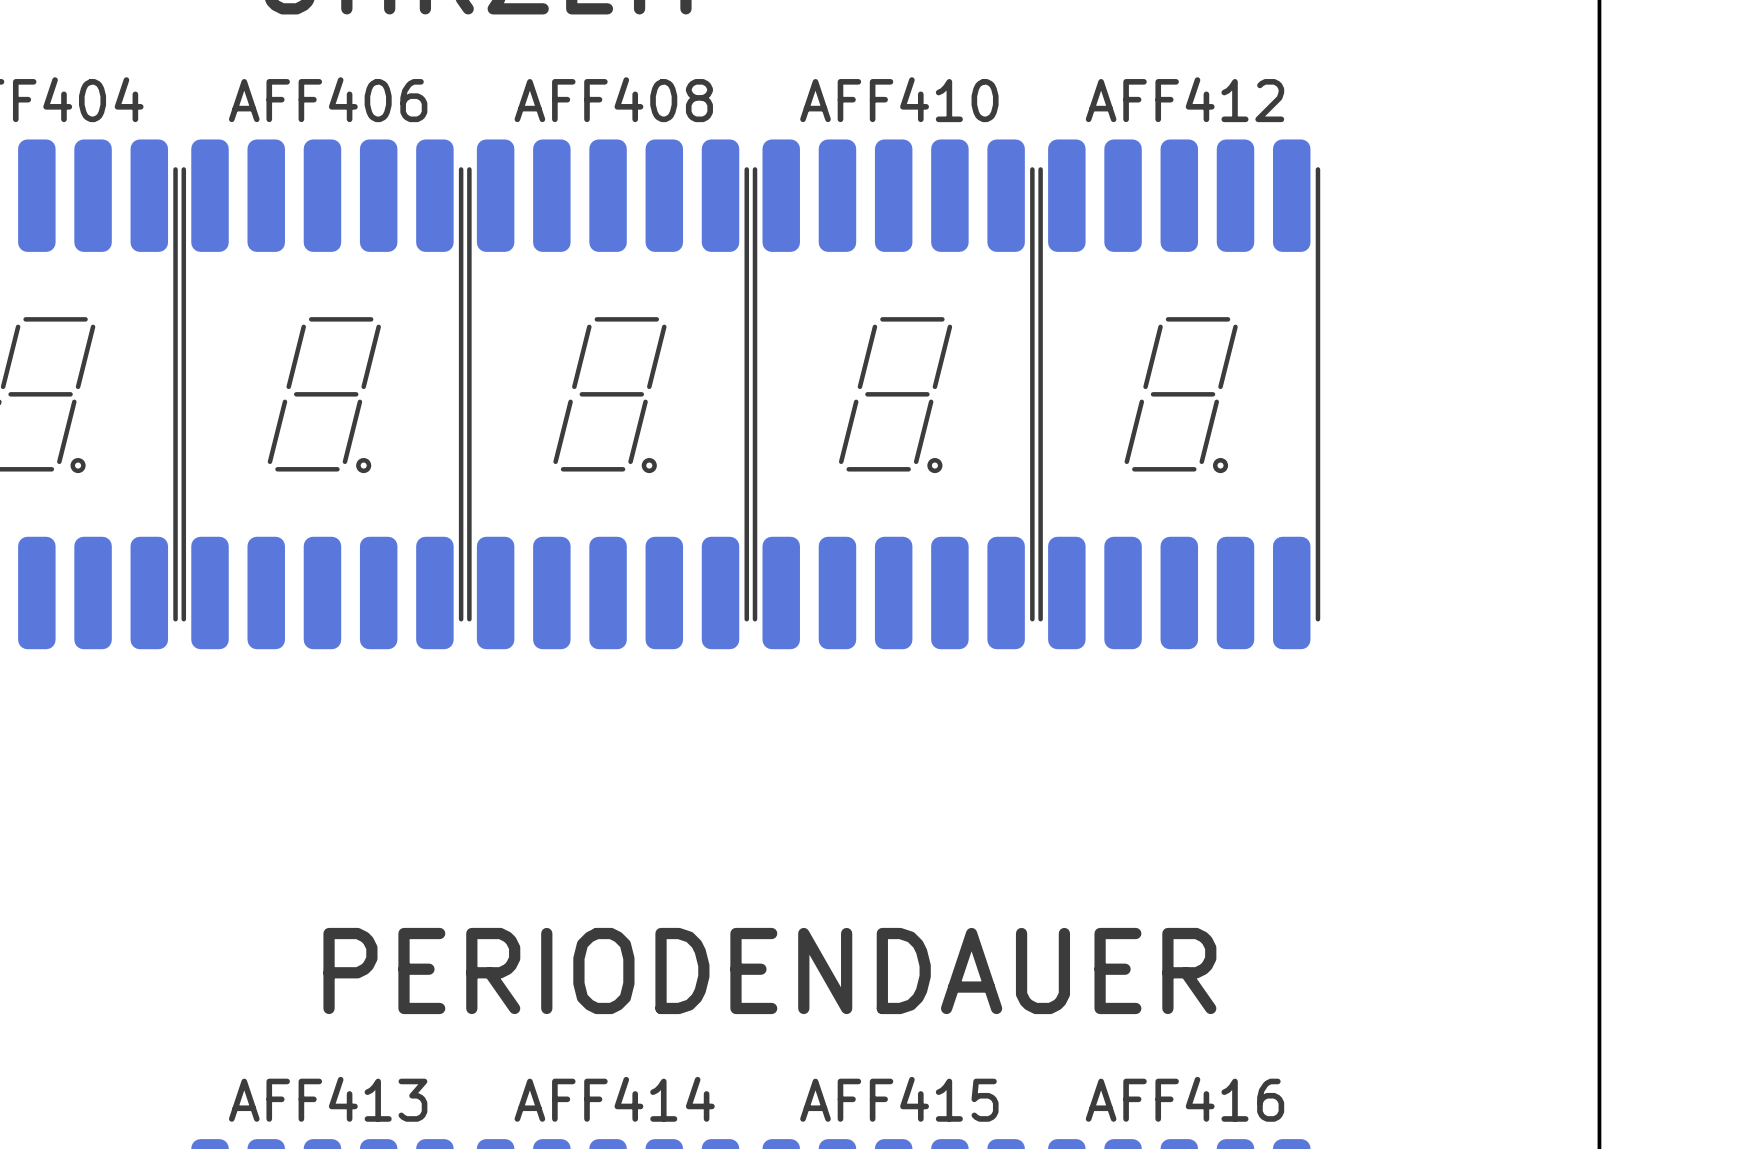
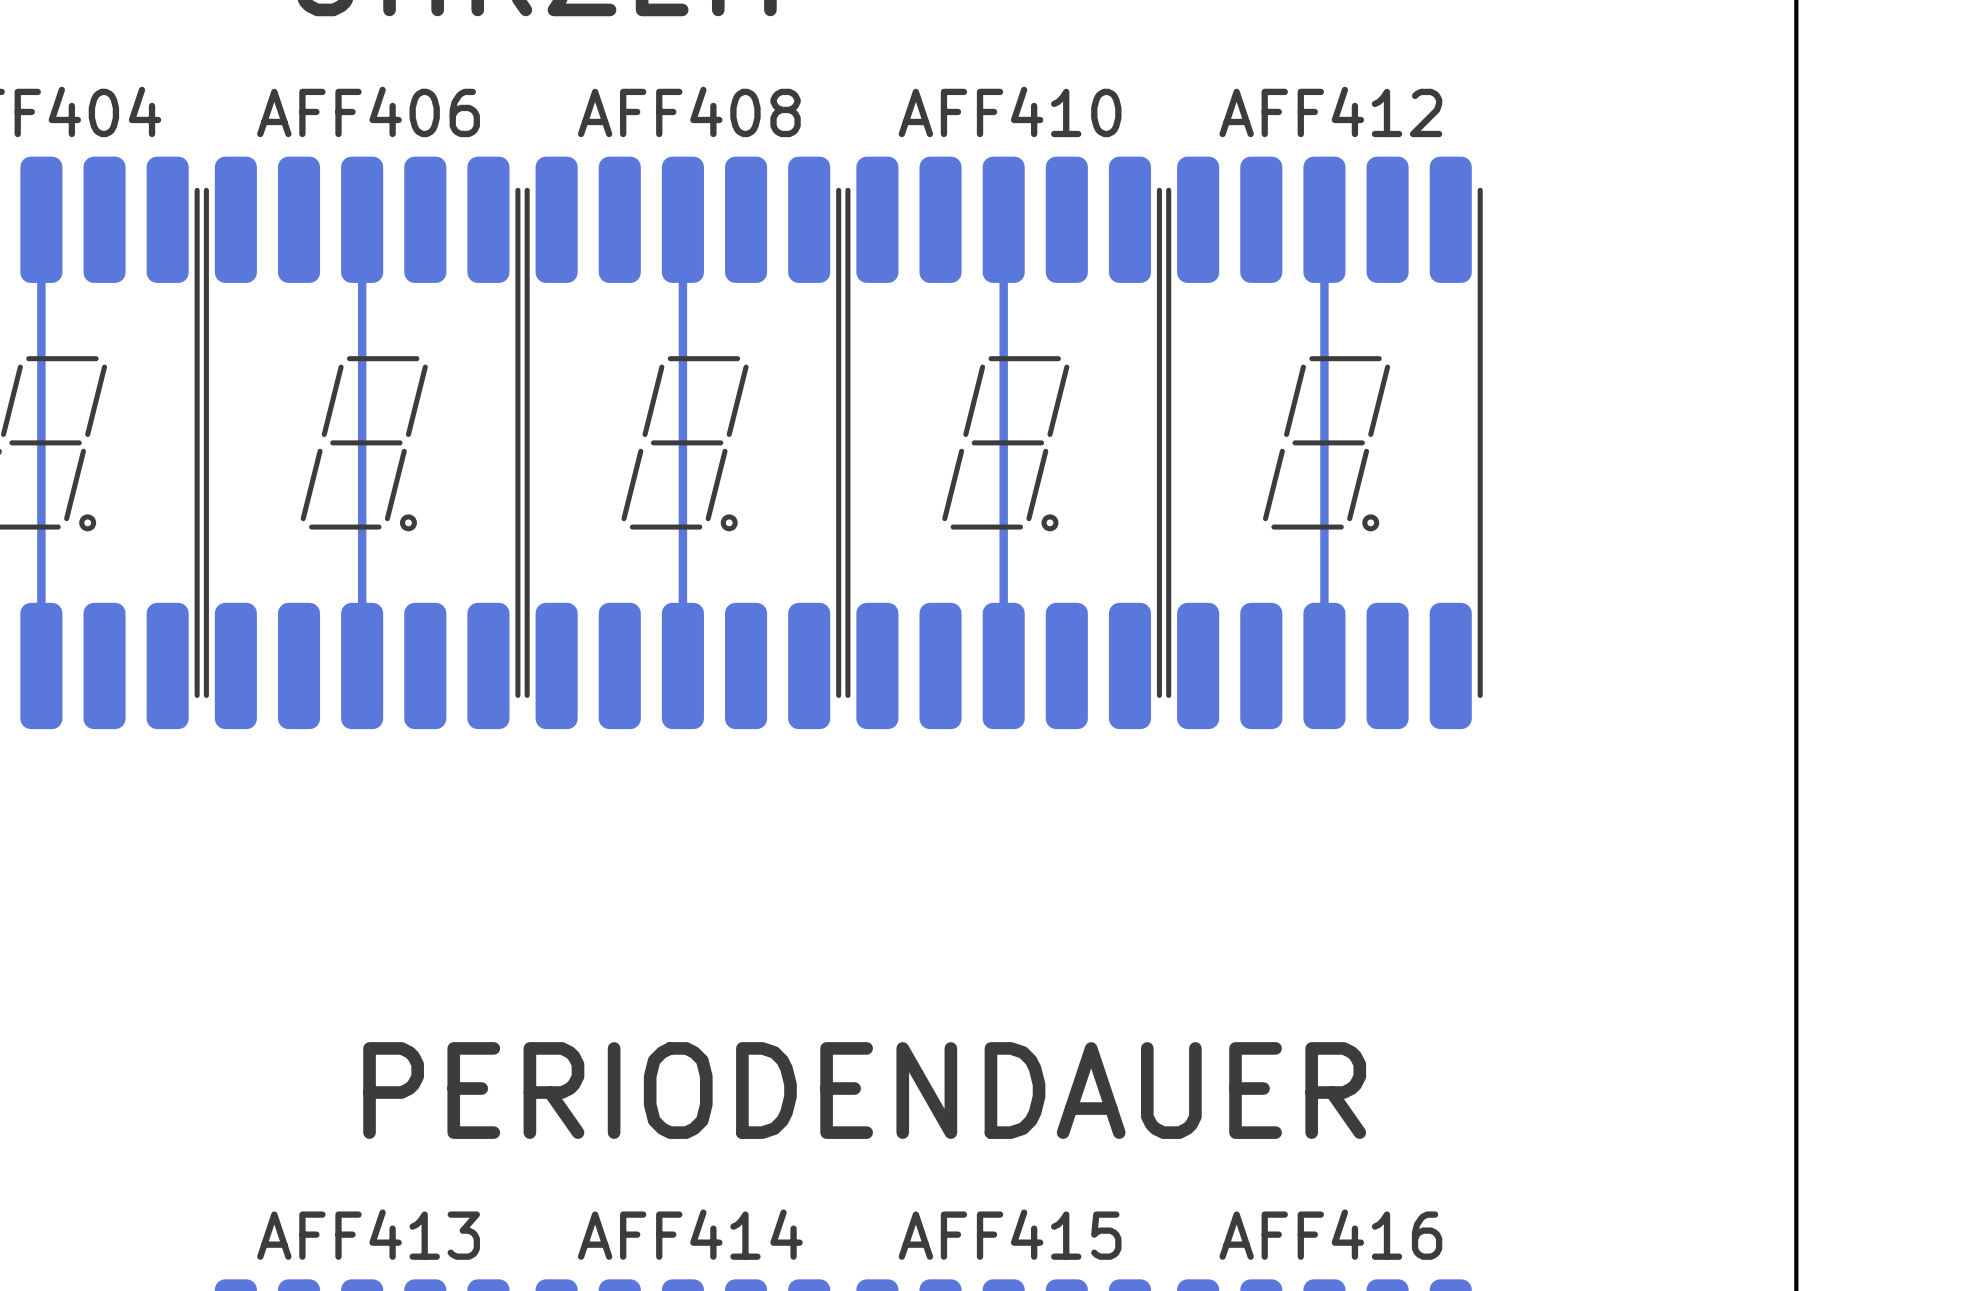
track: none -> (41, 219) (41, 665)
track: none -> (362, 219) (362, 665)
track: none -> (682, 219) (682, 665)
track: none -> (1003, 219) (1003, 665)
track: none -> (1324, 219) (1324, 665)

